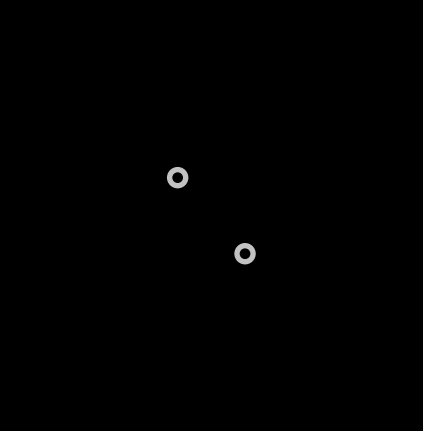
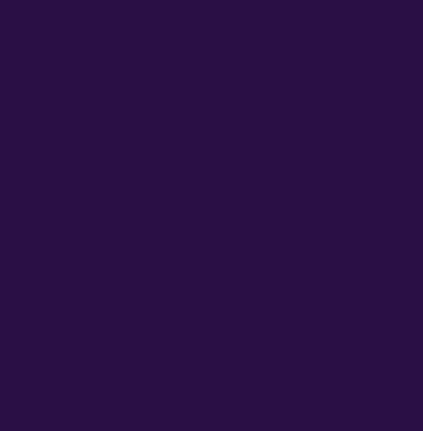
via: (177, 177) -> none
via: (245, 253) -> none

